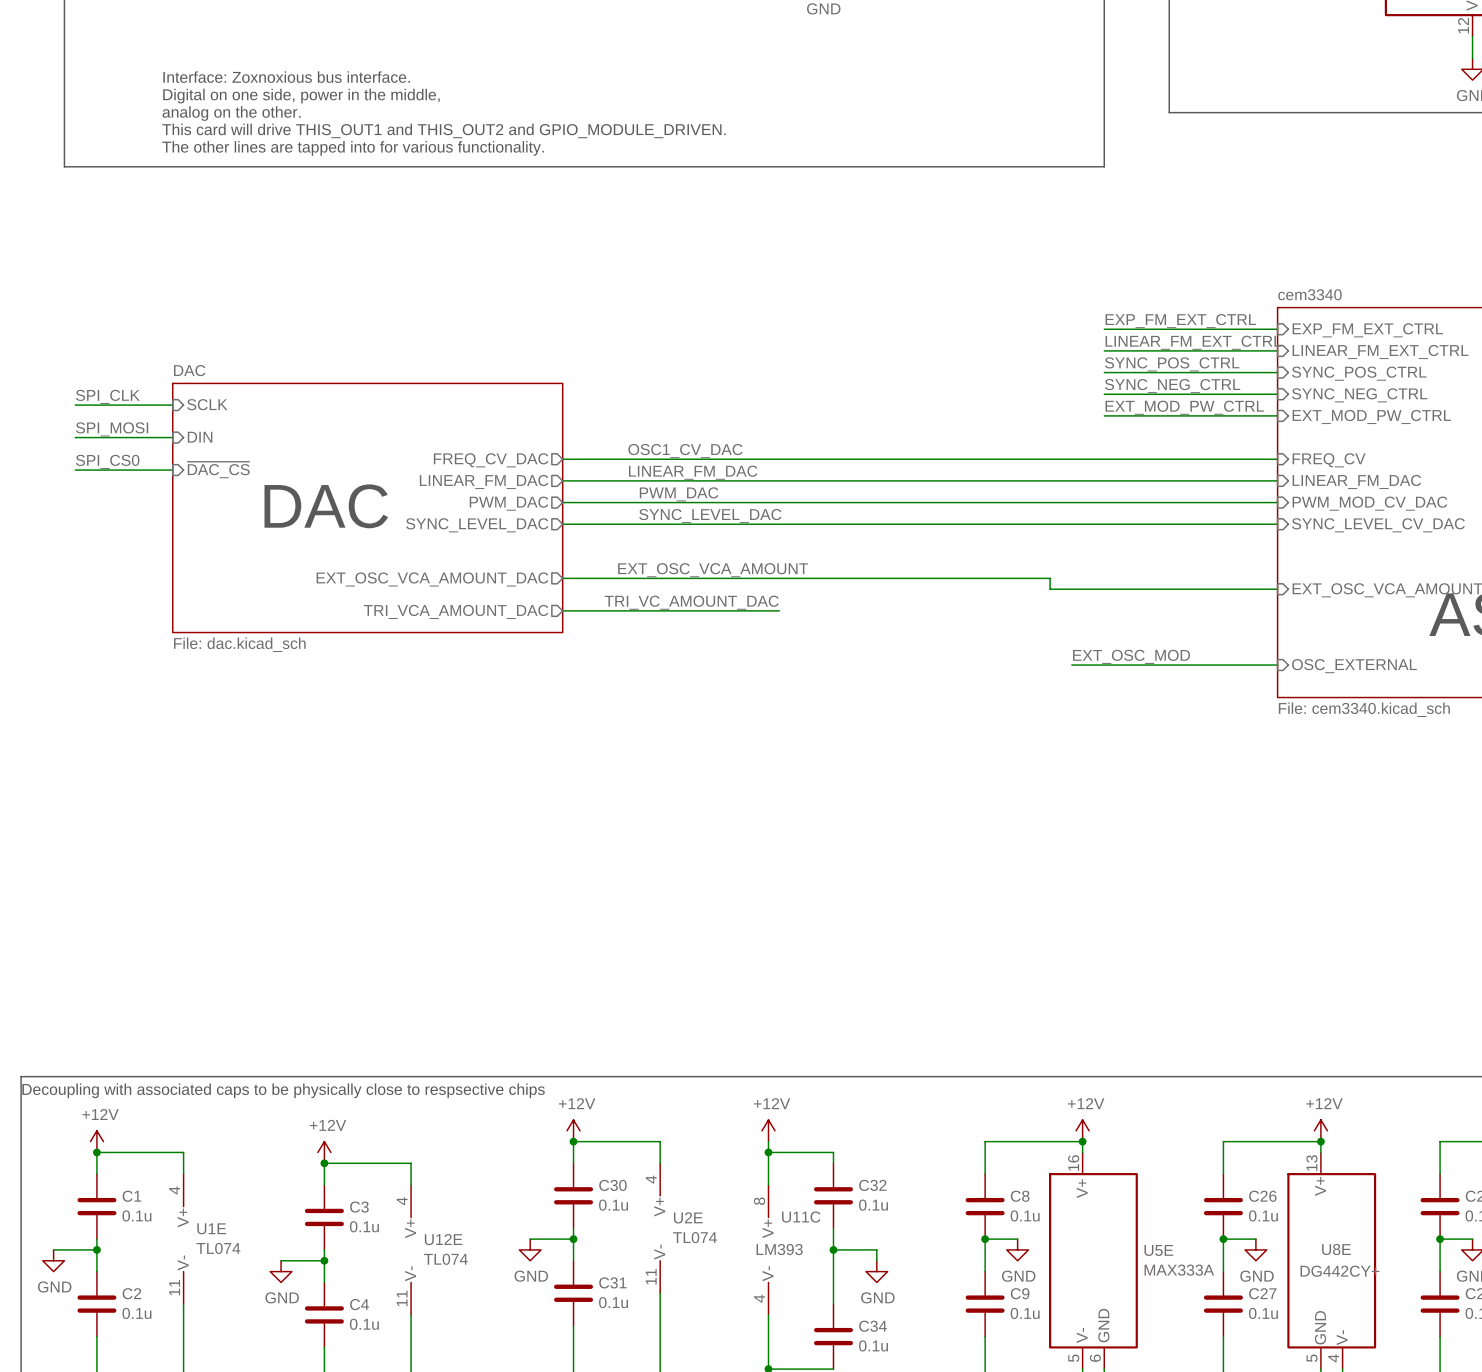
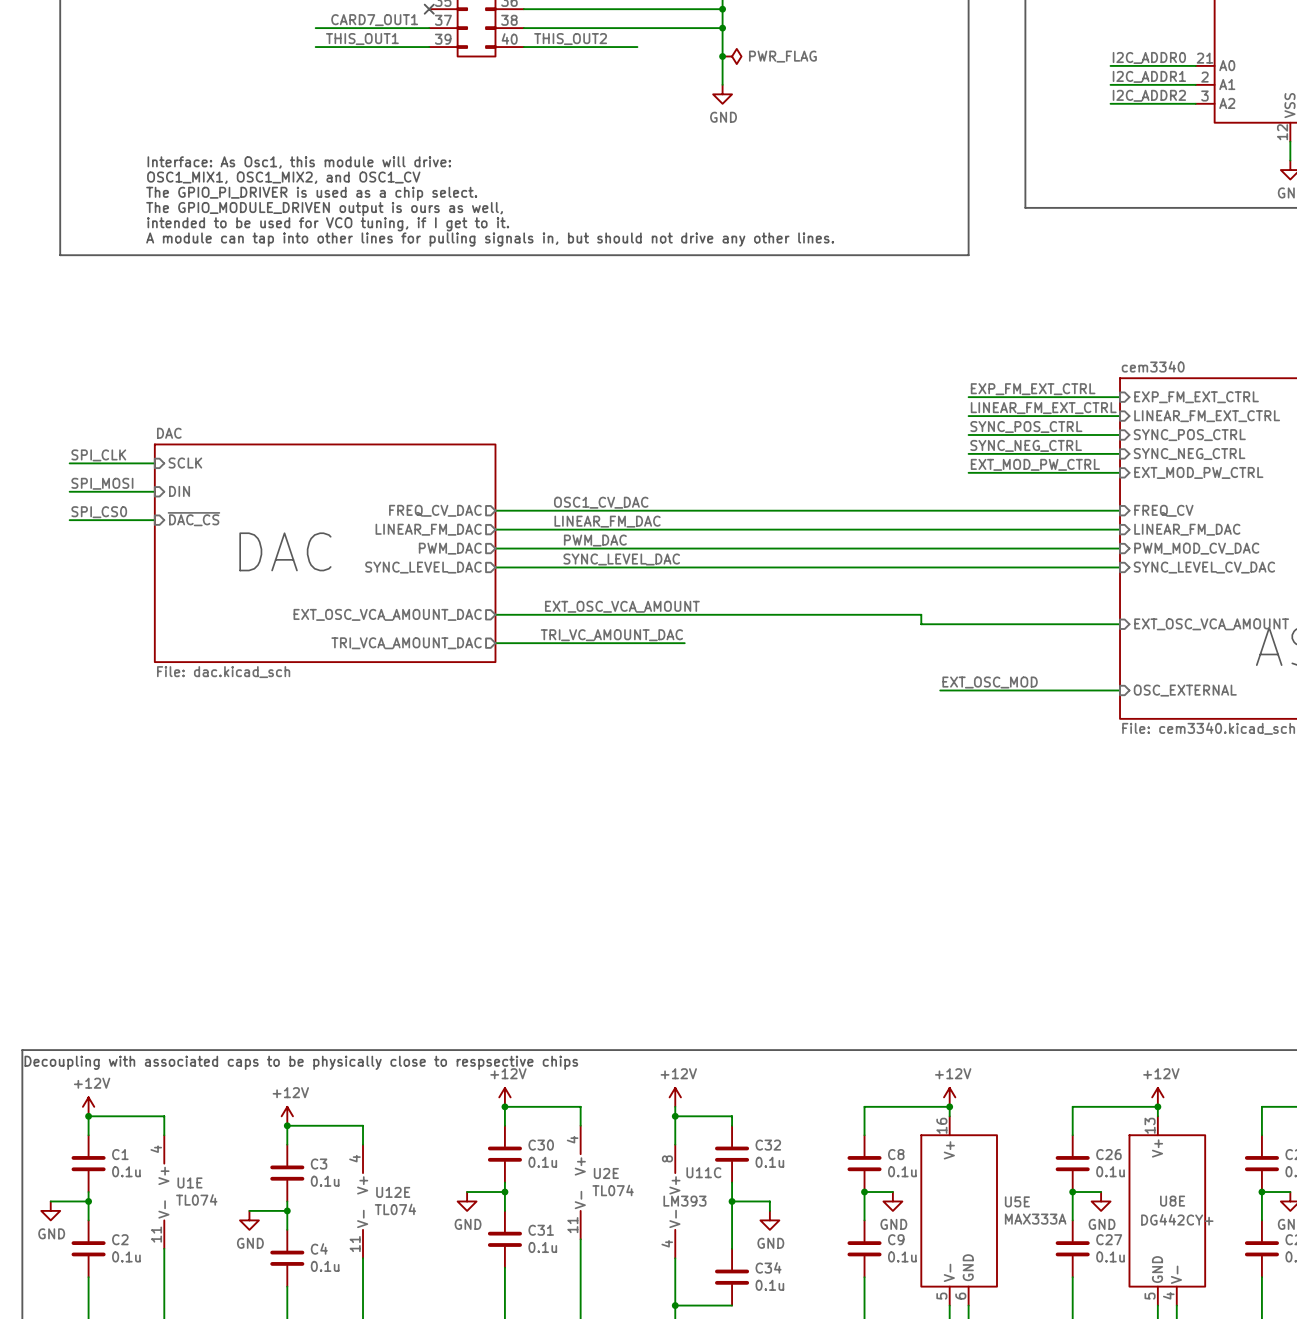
text: none -> Interface: As Osc1, this module will drive: (299, 162)
text: Interface: Zoxnoxious bus interface. (286, 77) -> OSC1_MIX1, OSC1_MIX2, and OSC1_CV (283, 177)
text: Digital on one side, power in the middle, (301, 96) -> The GPIO_PI_DRIVER is used as a chip select. (311, 193)
text: analog on the other. (231, 113) -> The GPIO_MODULE_DRIVEN output is ours as well, (324, 209)
text: This card will drive THIS_OUT1 and THIS_OUT2 and GPIO_MODULE_DRIVEN. (443, 130) -> intended to be used for VCO tuning, if I get to it. (328, 224)
text: The other lines are tapped into for various functionality. (353, 148) -> A module can tap into other lines for pulling signals in, but should not drive any other lines. (490, 239)

